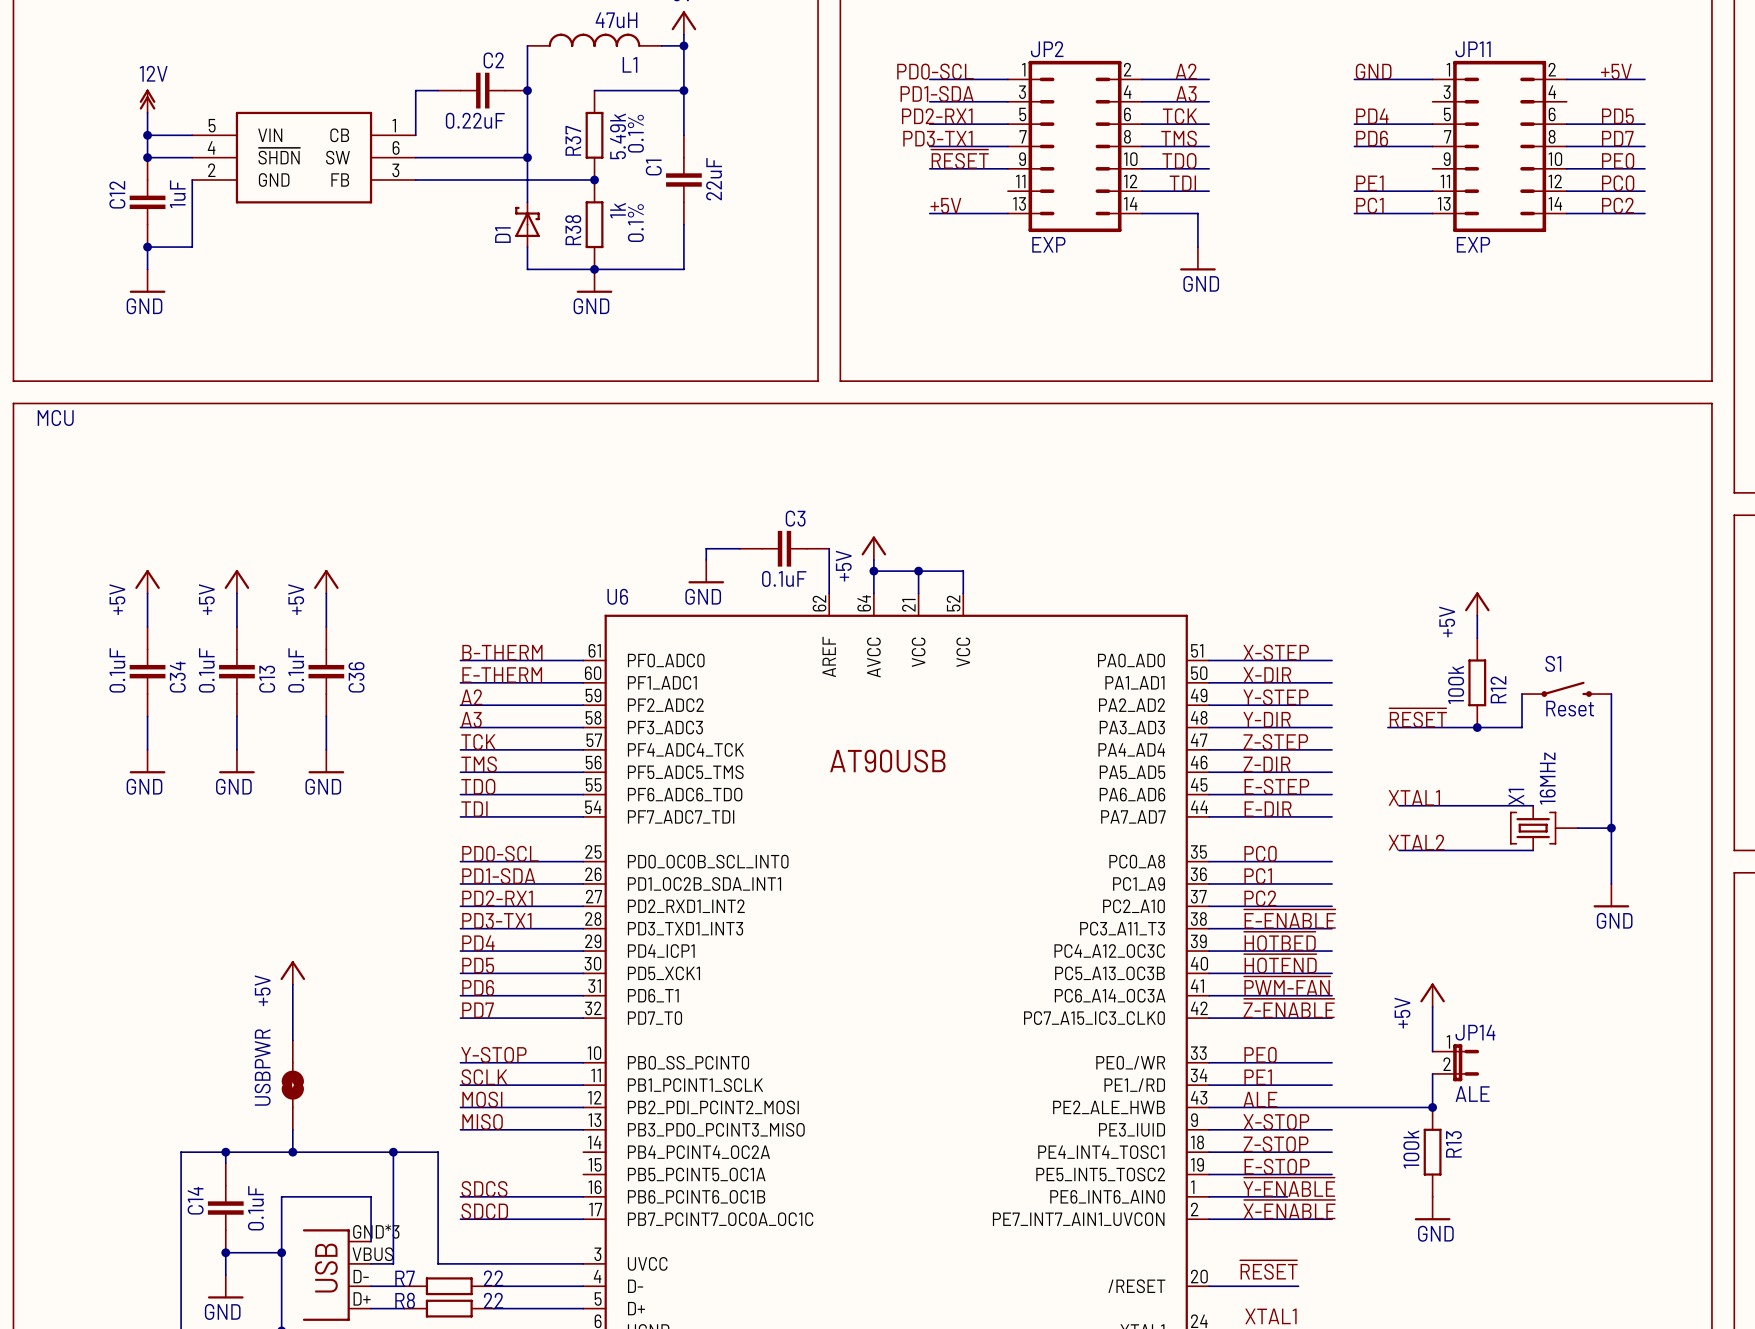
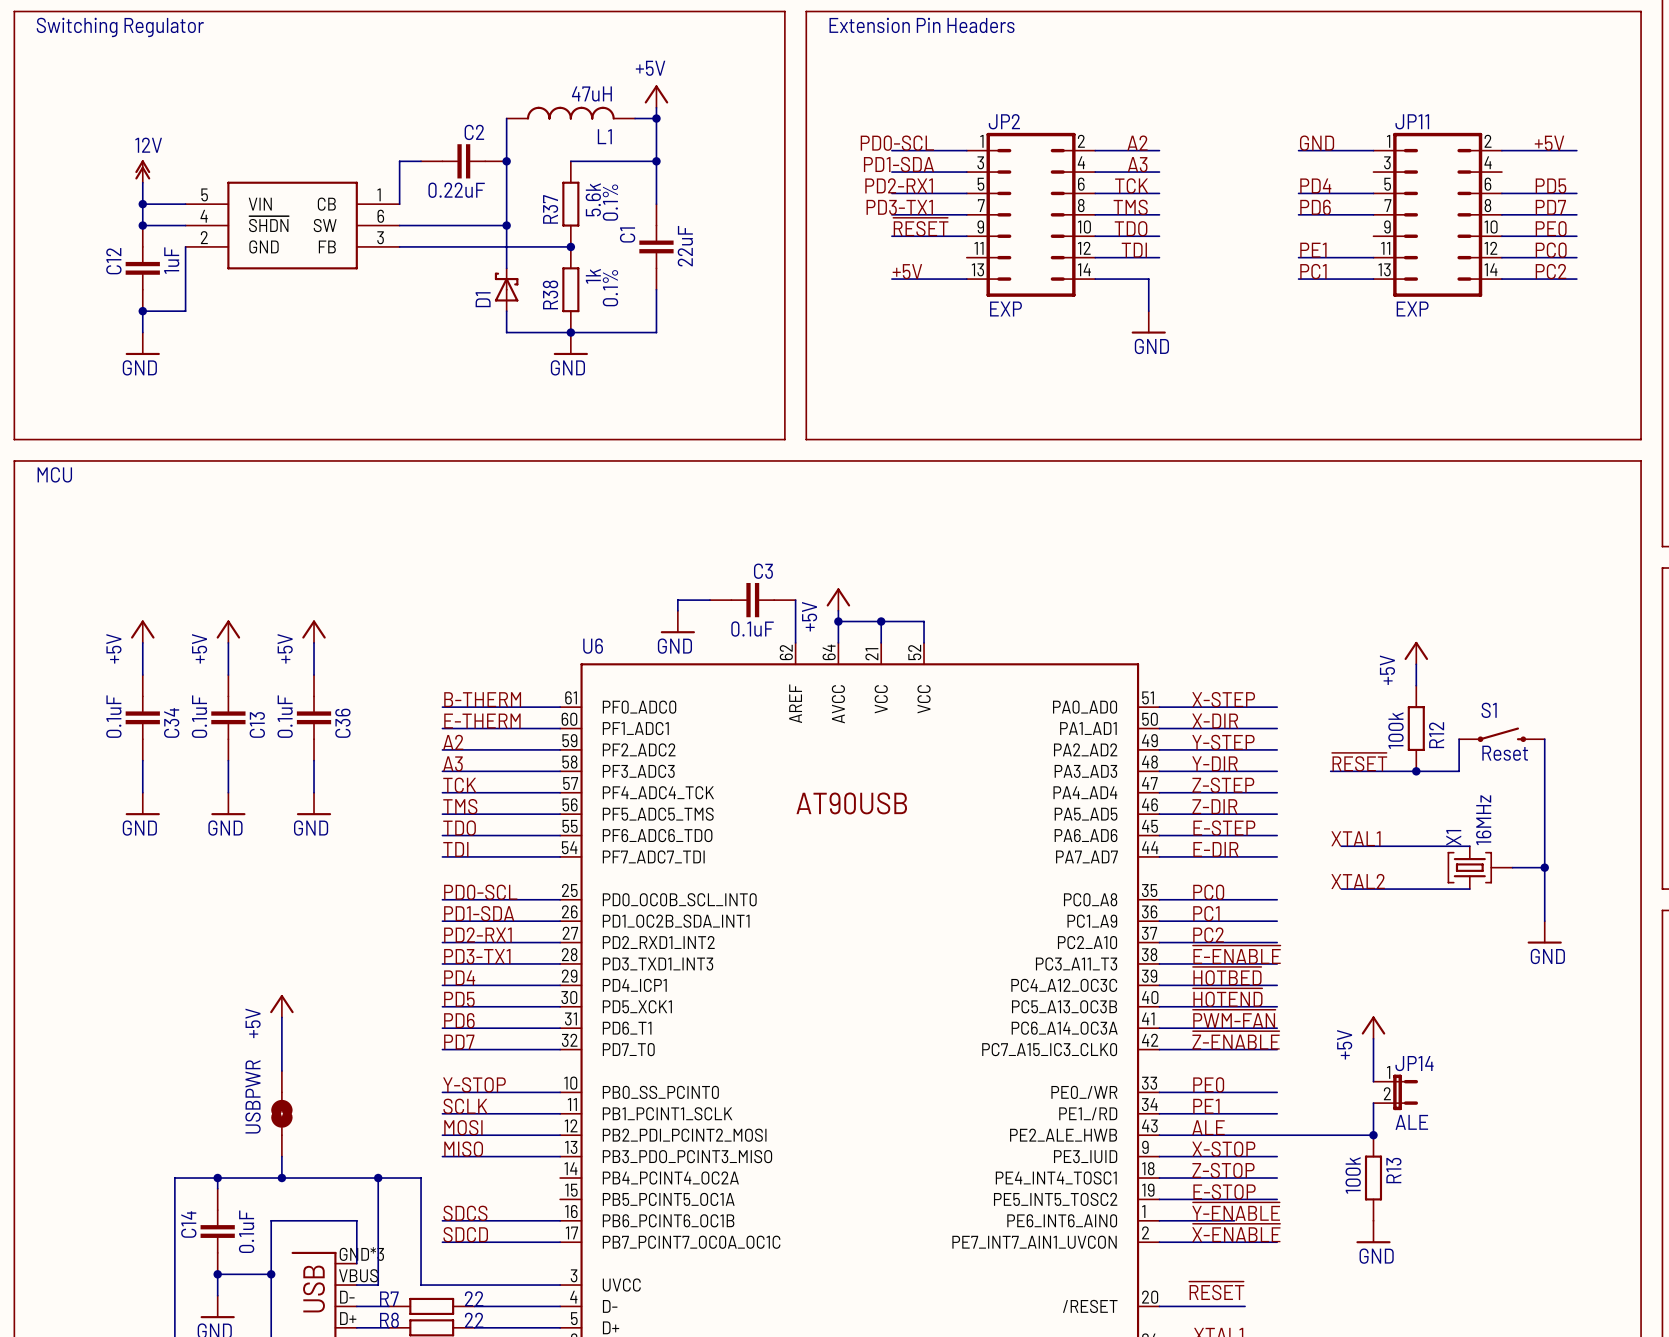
R37 value: 5.49k (618, 136) -> 5.6k (593, 199)

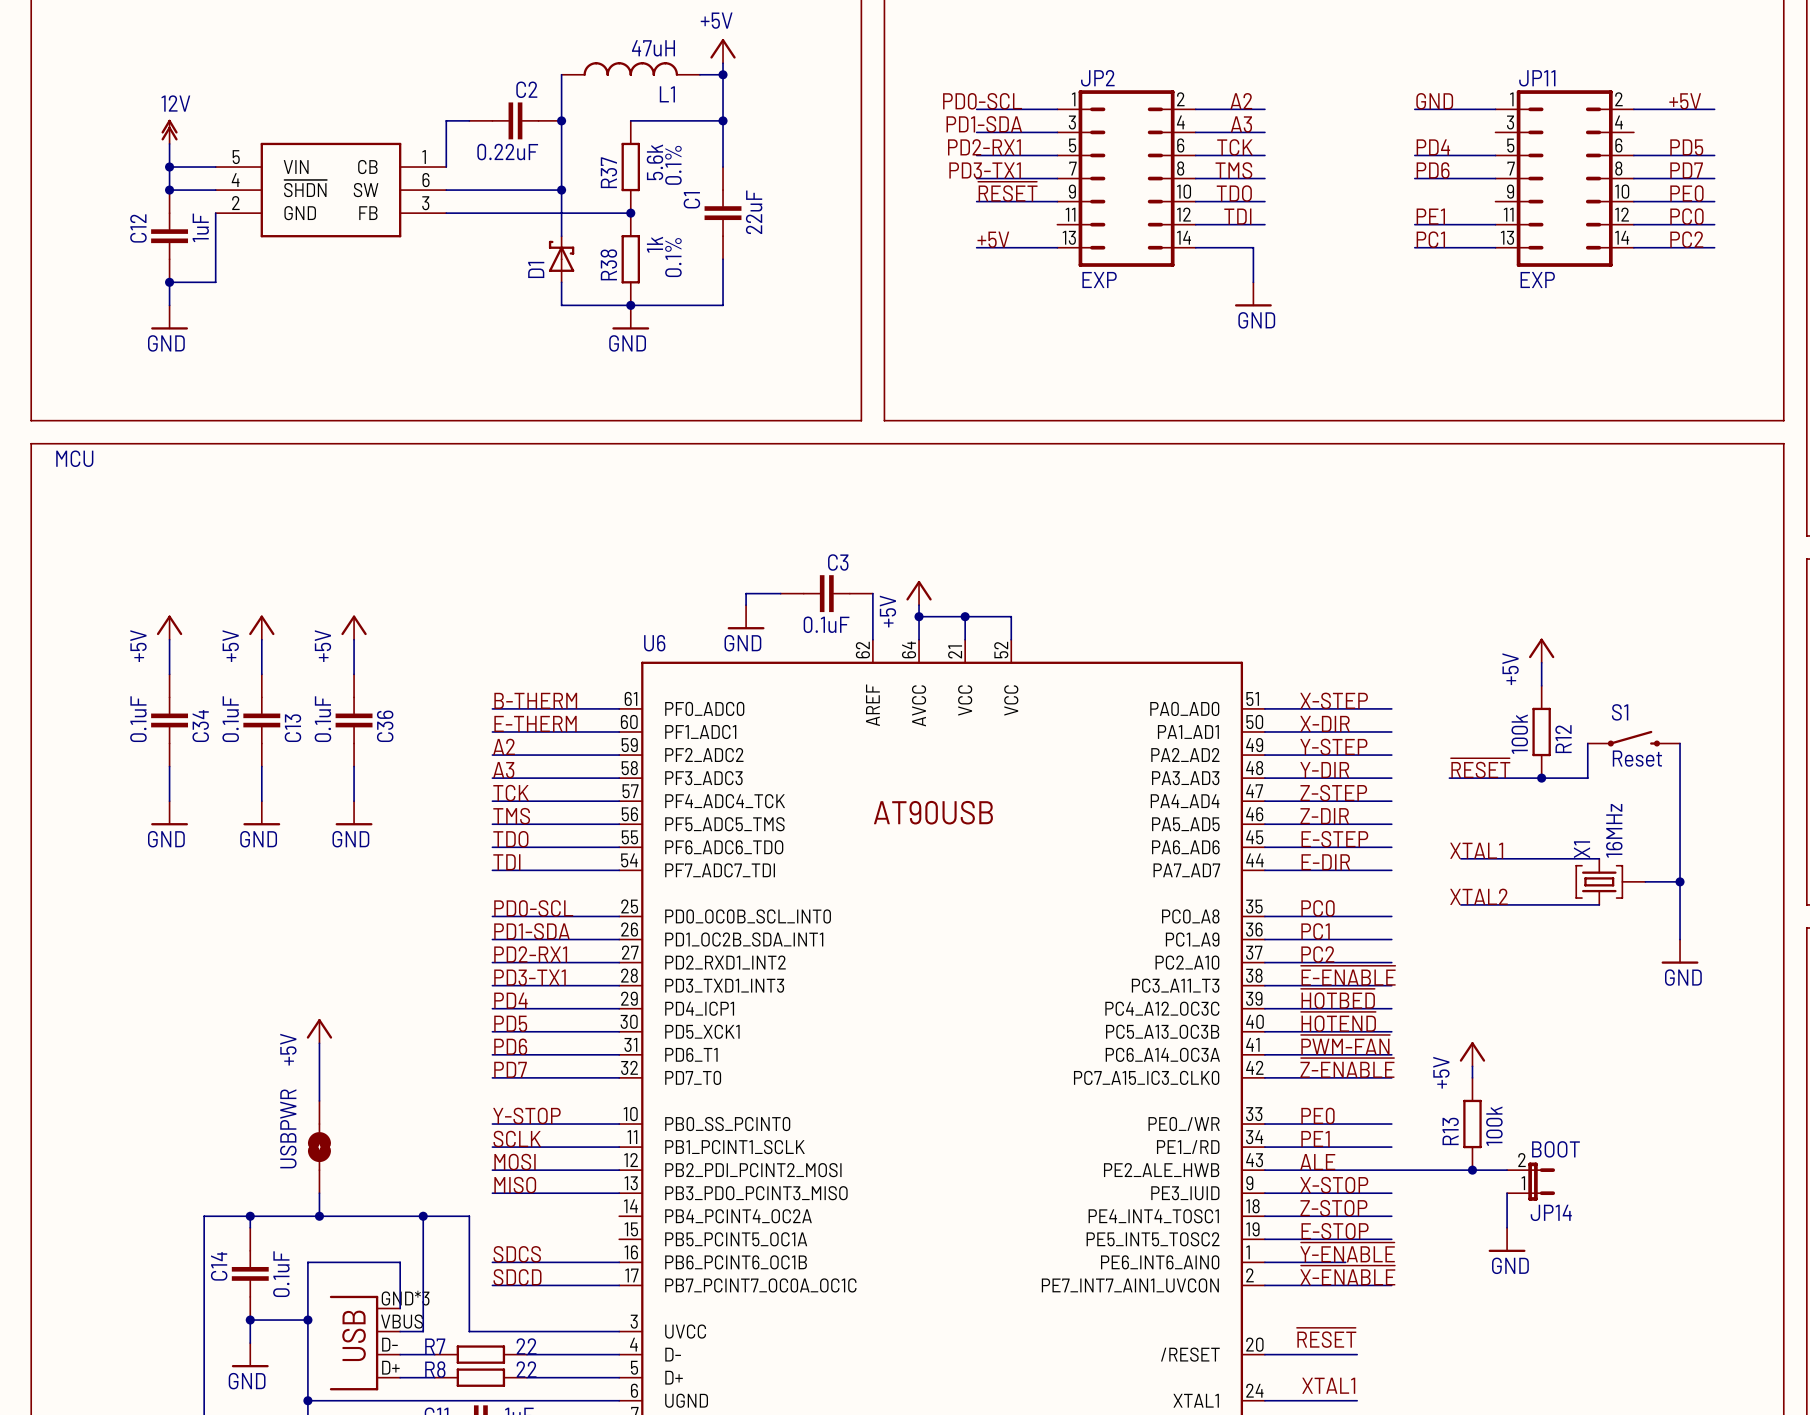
power symbol position: +5V (1373, 1027) -> +5V (1472, 1054)
wire: none -> (1472, 1066) (1472, 1077)
wire: (1373, 1038) (1373, 1081) -> none
JP14 position: (1395, 1092) -> (1531, 1181)
JP14 flip: as is (1405, 1092) -> up-down (1541, 1181)
wire: (1373, 1103) (1373, 1135) -> (1507, 1170) (1495, 1170)
JP14 value: ALE (1411, 1122) -> BOOT (1555, 1149)
junction position: (1373, 1135) -> (1472, 1170)
wire: none -> (1507, 1193) (1507, 1227)
R13 name position: R13 (1393, 1170) -> R13 (1450, 1131)
R13 value position: 100k (1353, 1175) -> 100k (1494, 1126)
R13 position: (1373, 1178) -> (1472, 1124)
power symbol position: GND (1373, 1232) -> GND (1507, 1239)

